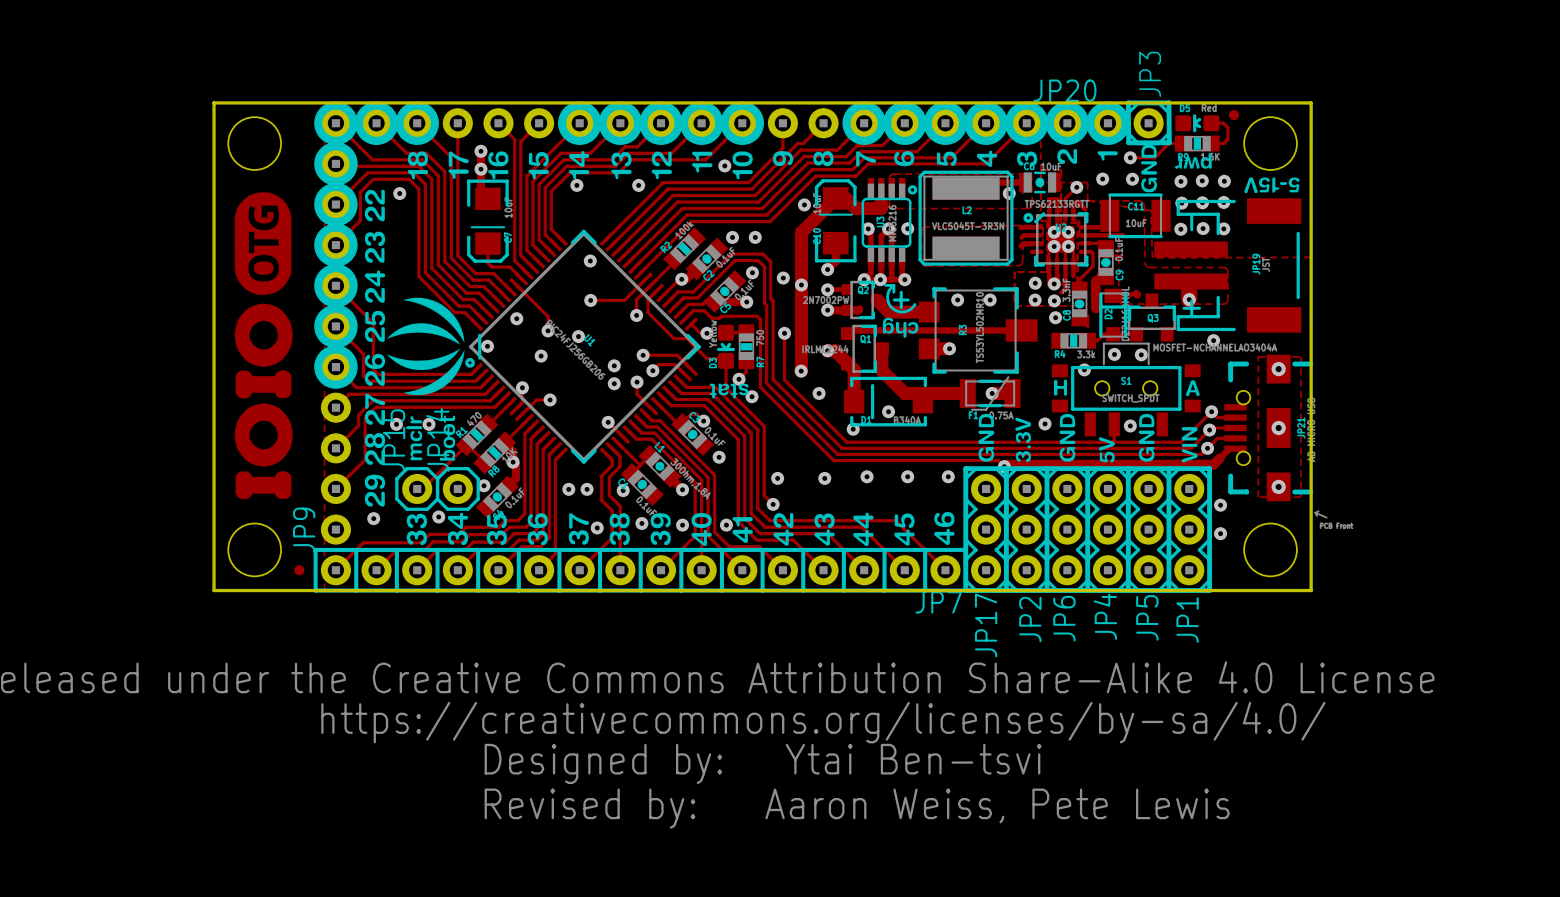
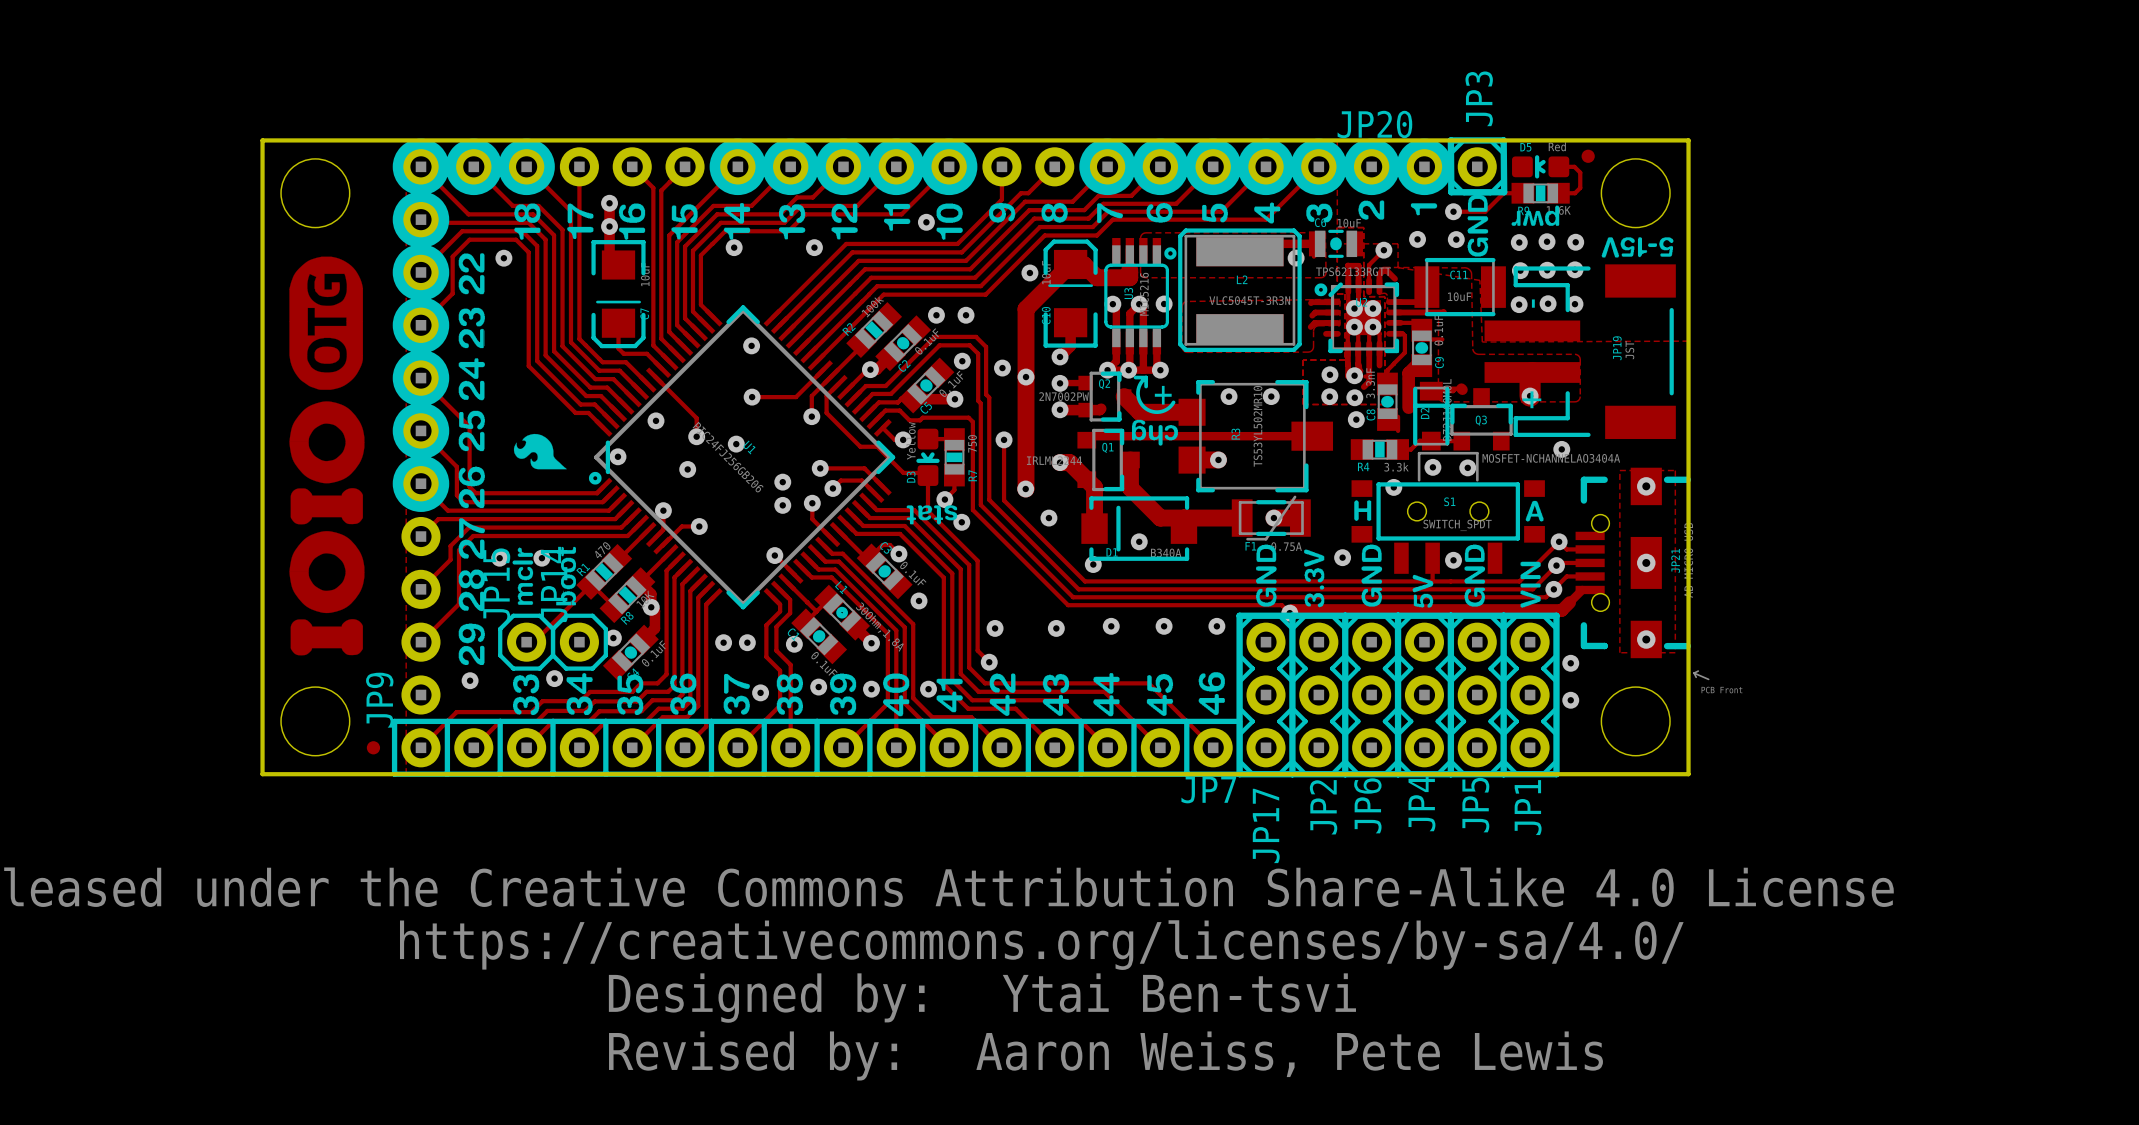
drawing shape: [387, 297, 465, 396] -> [513, 433, 567, 470]

